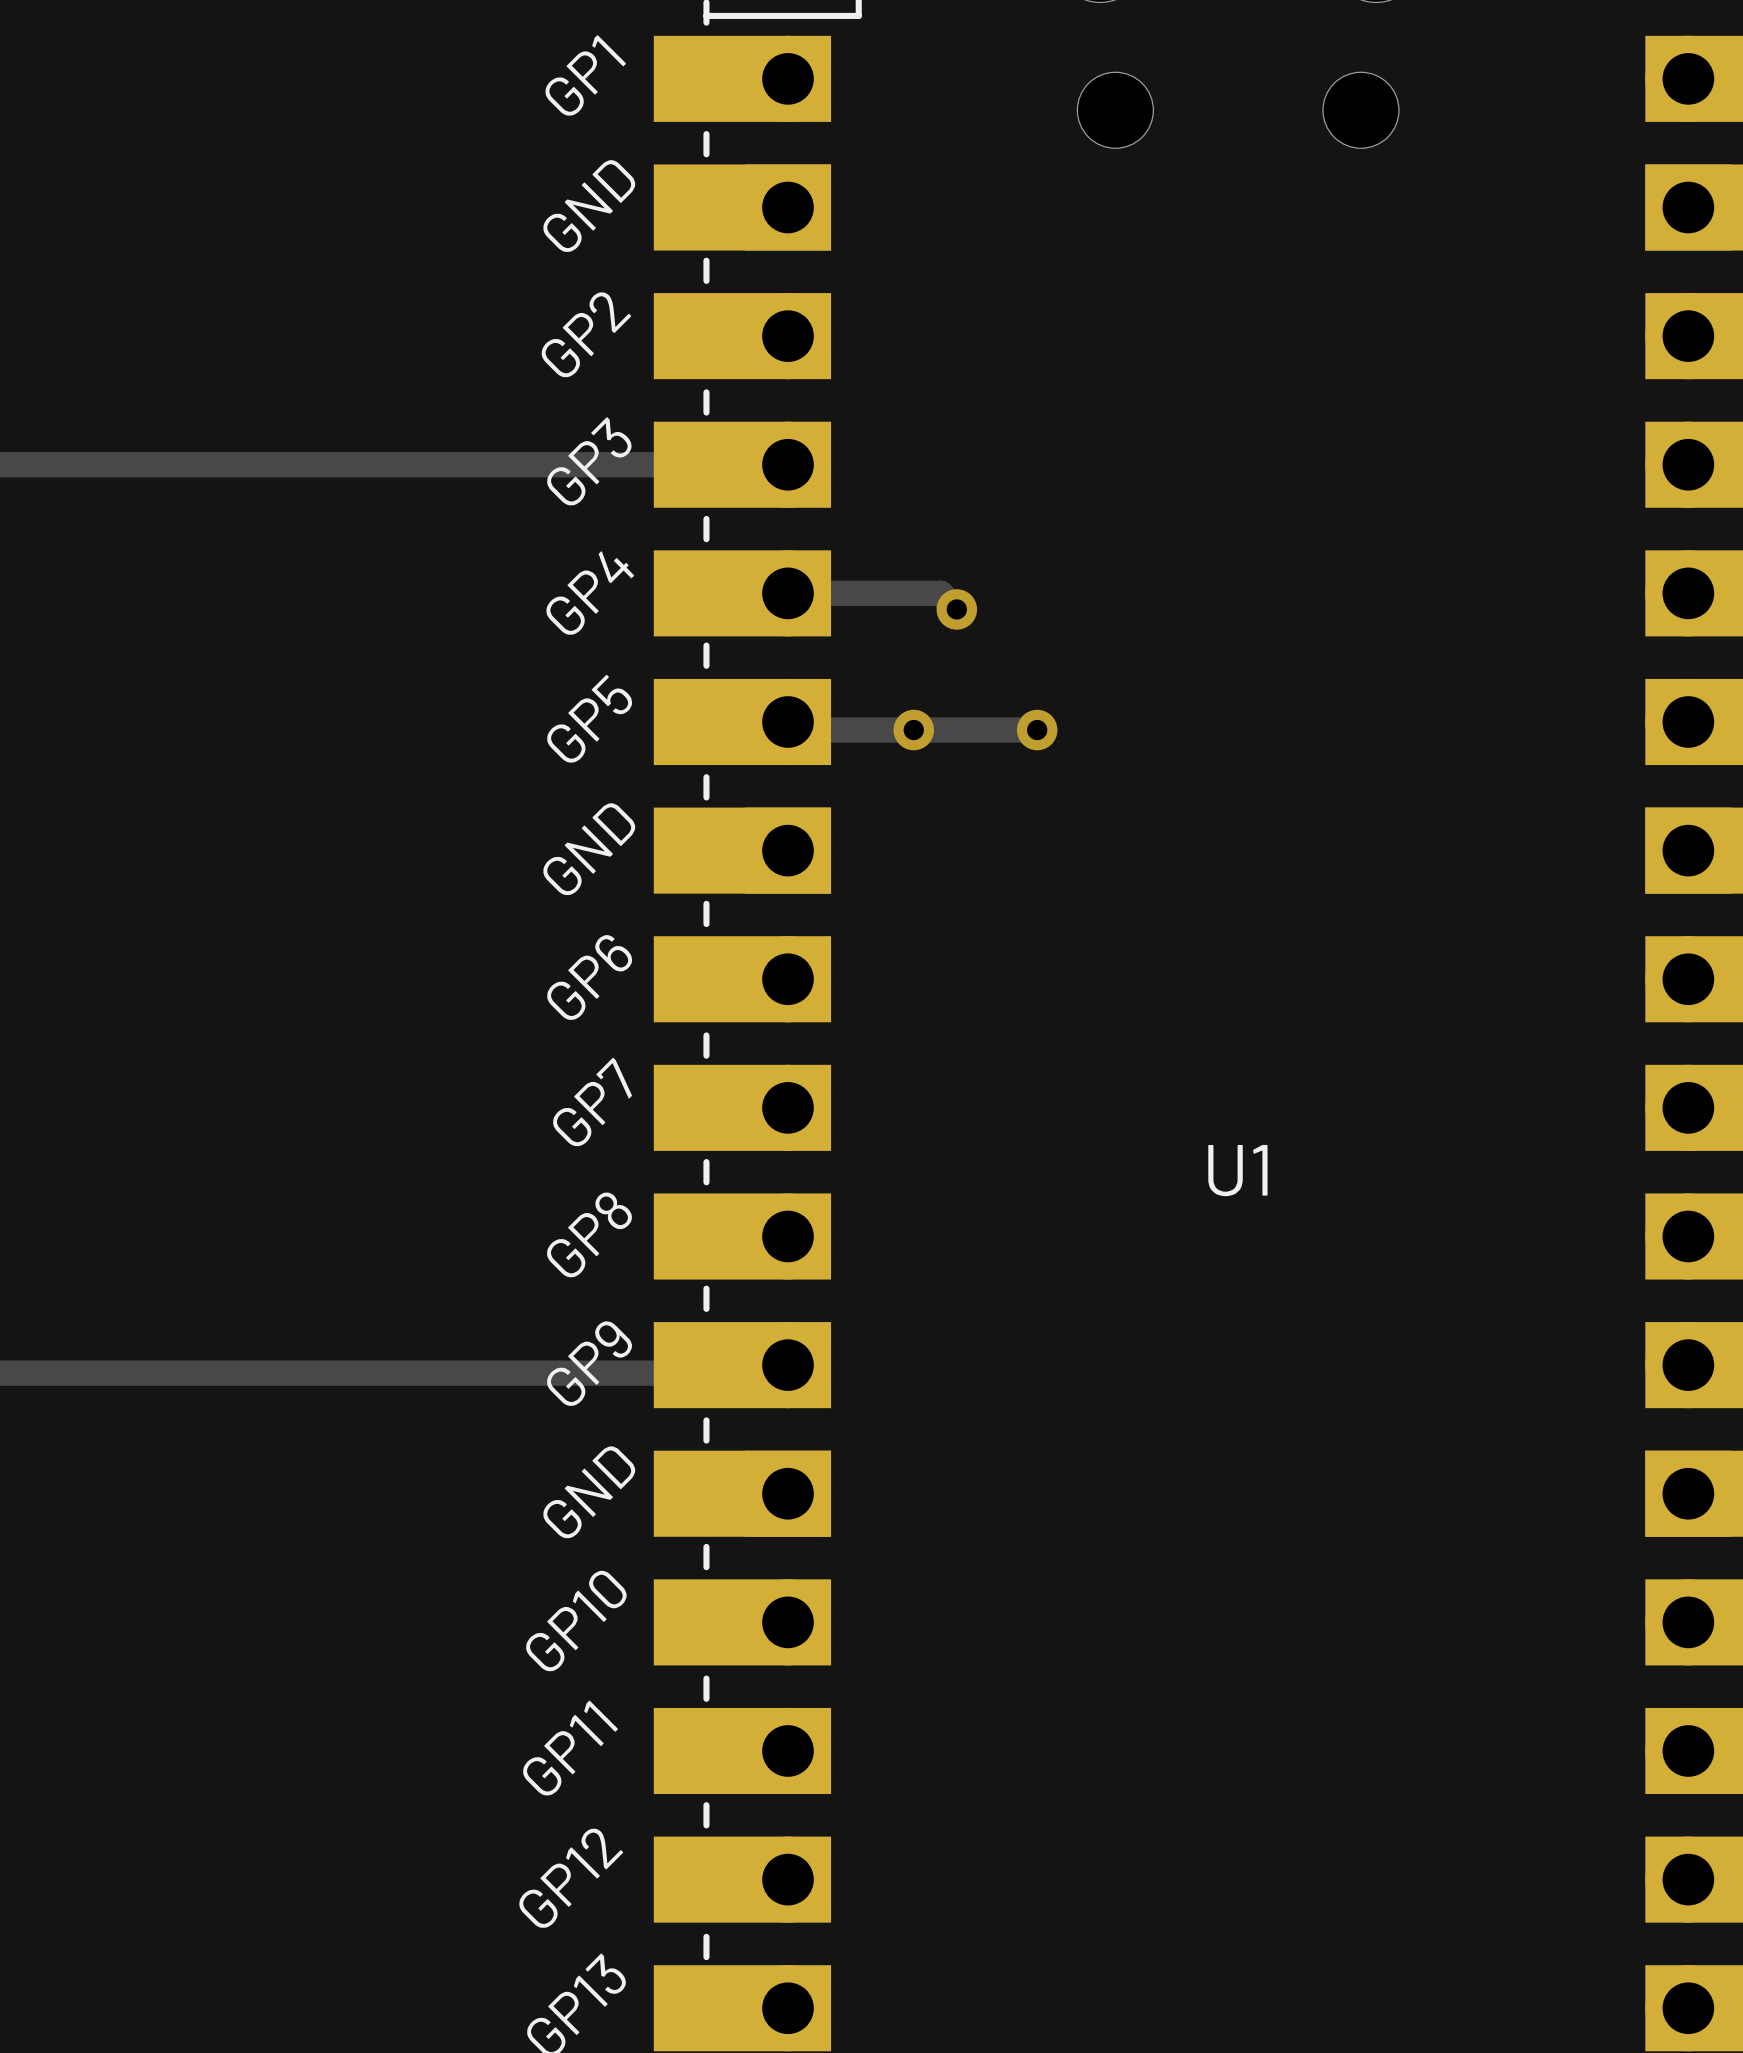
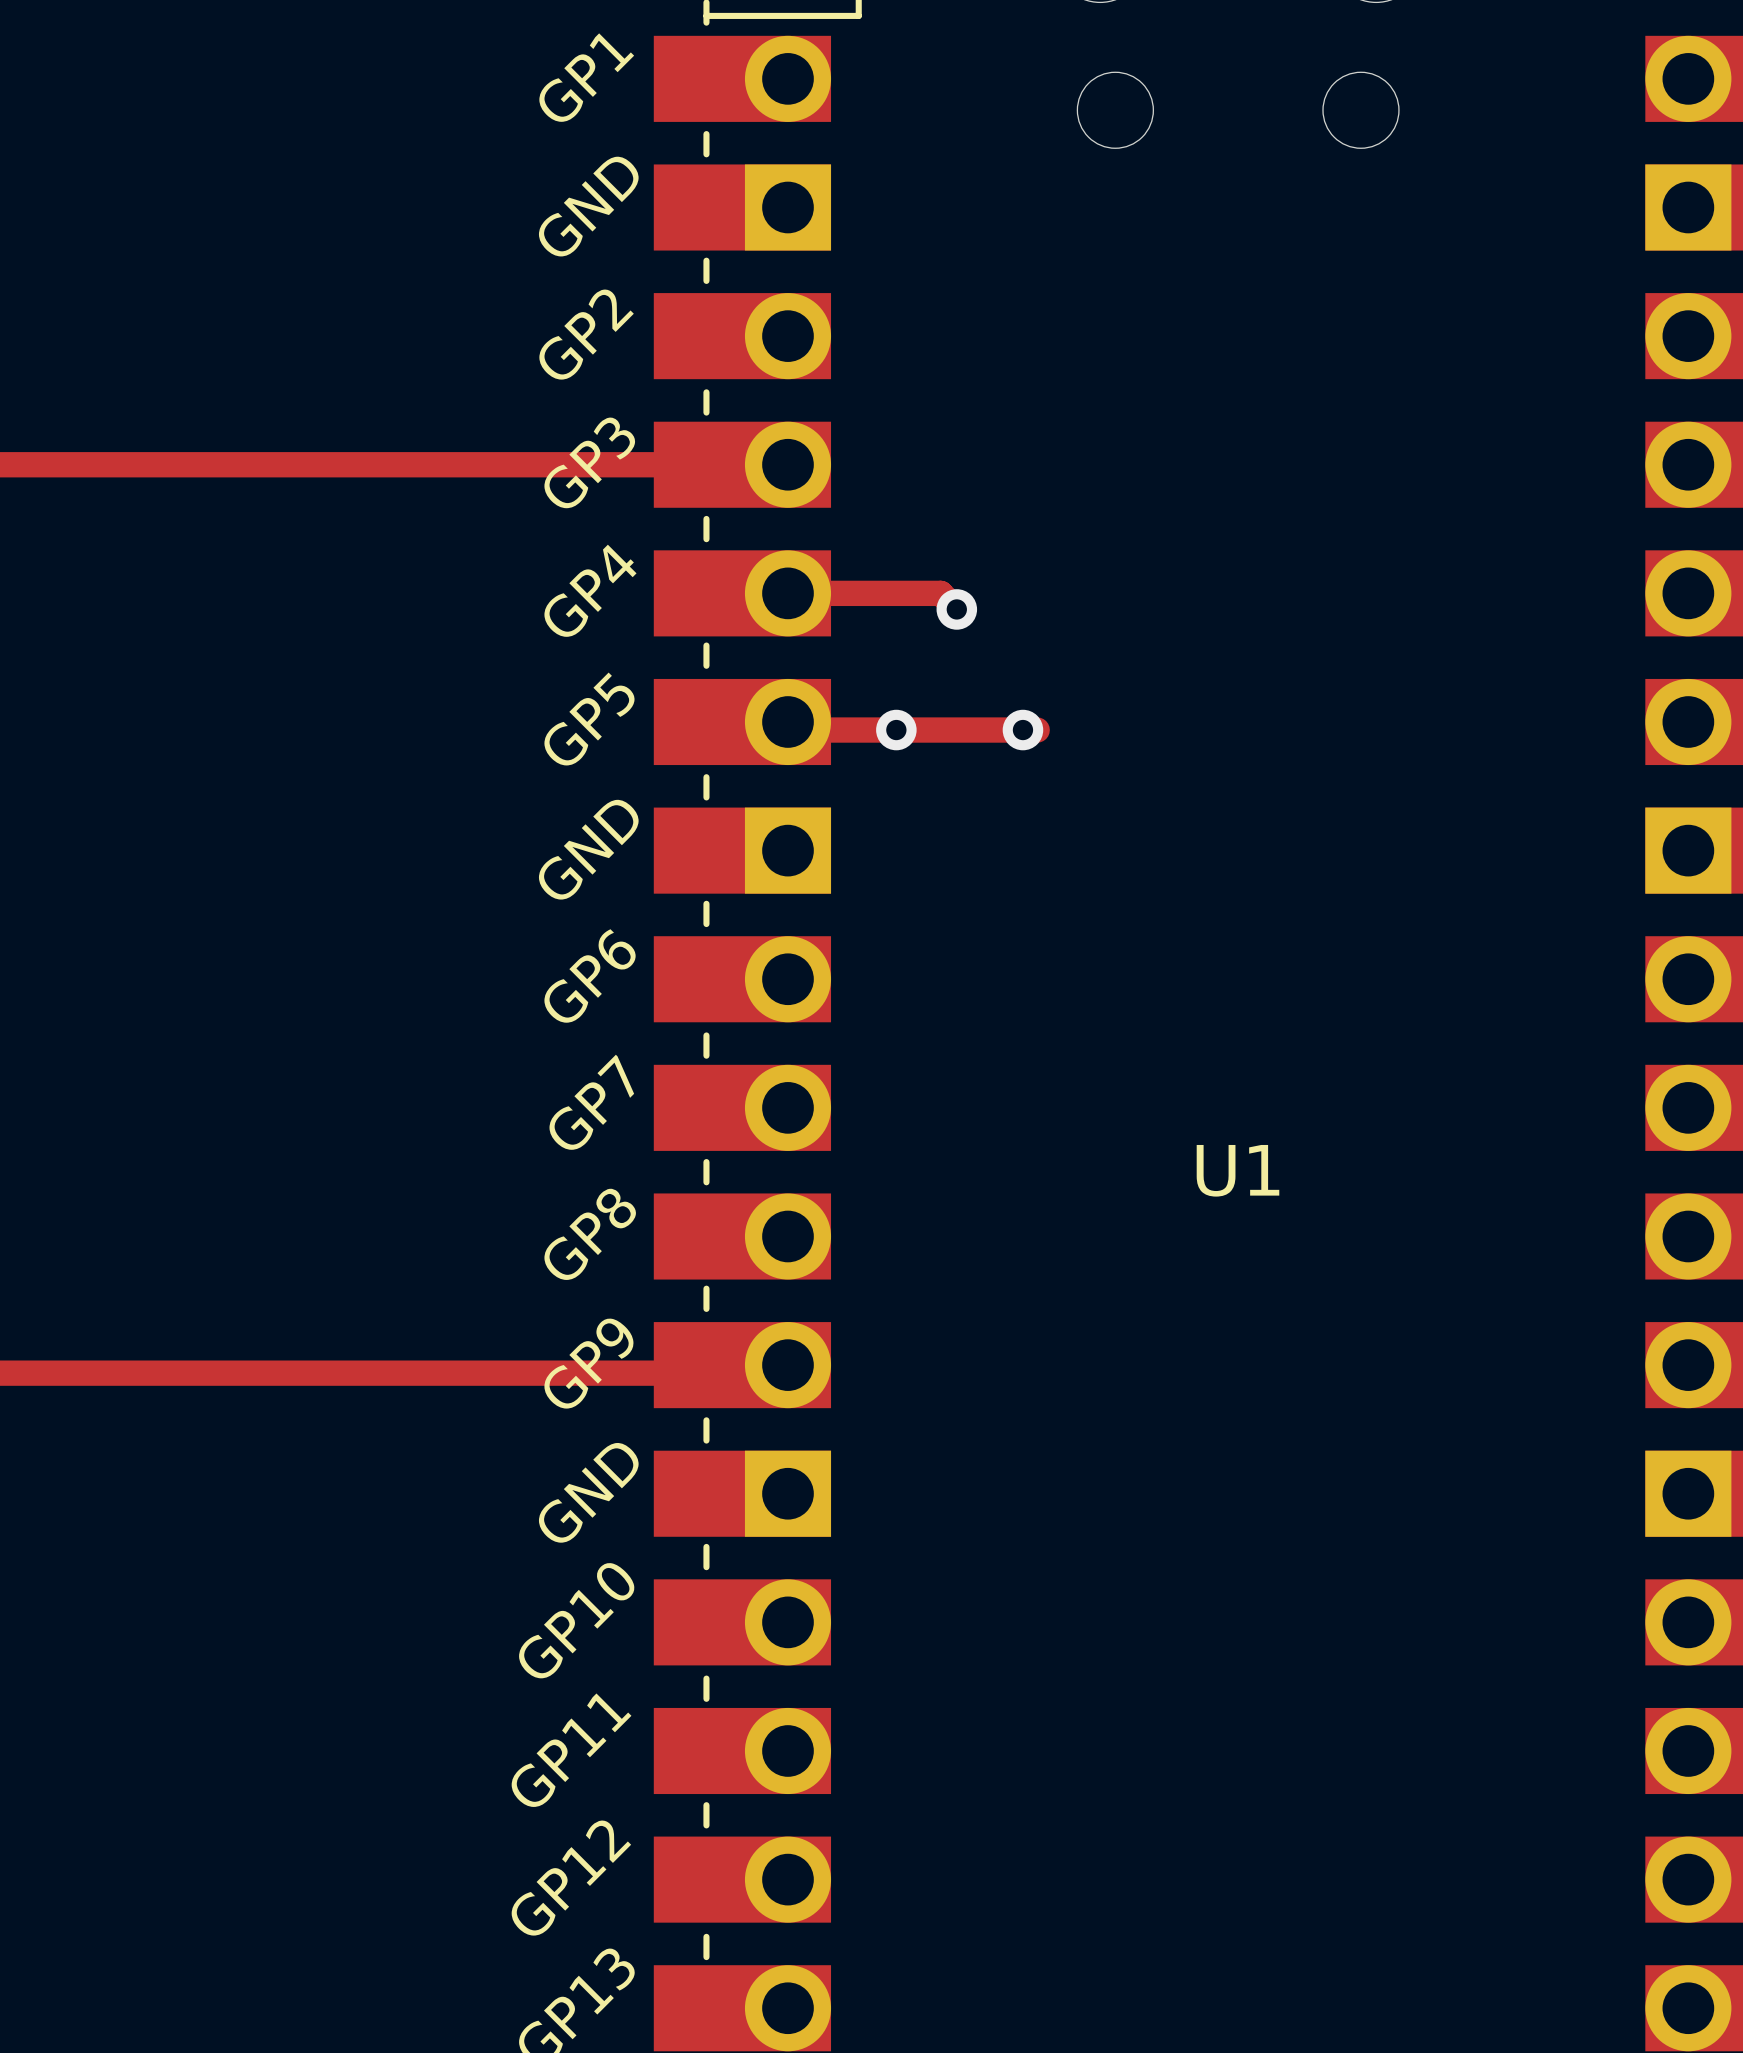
via position: (913, 730) -> (896, 730)
via position: (1037, 730) -> (1022, 730)

